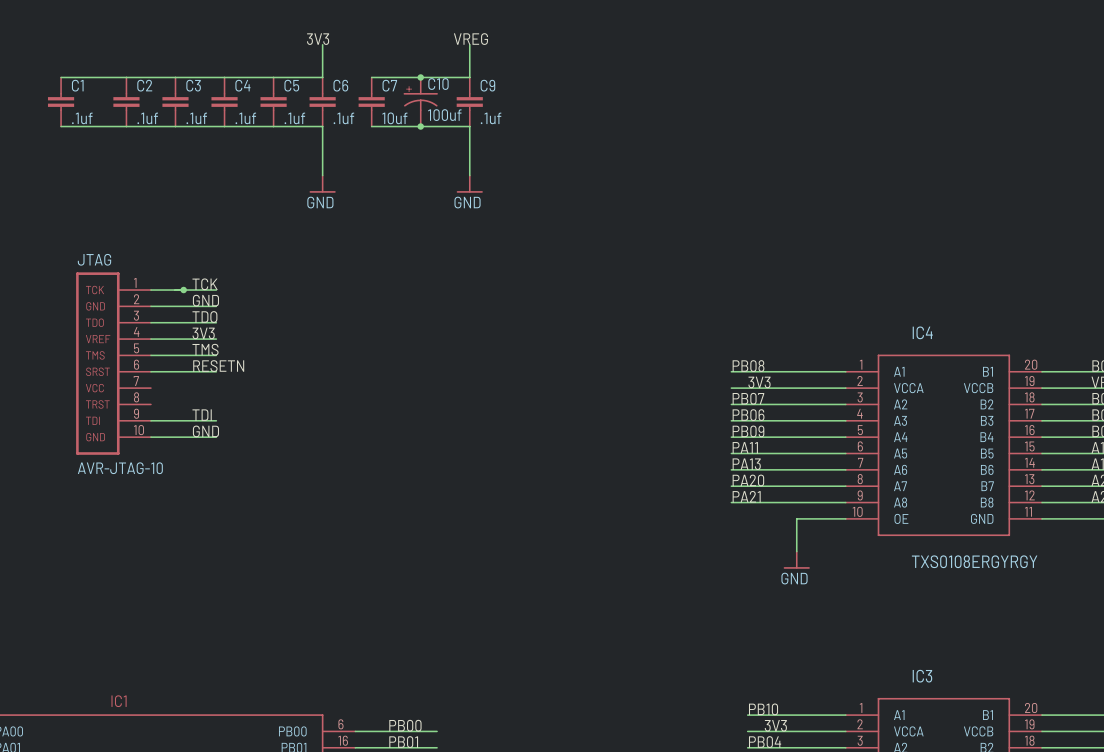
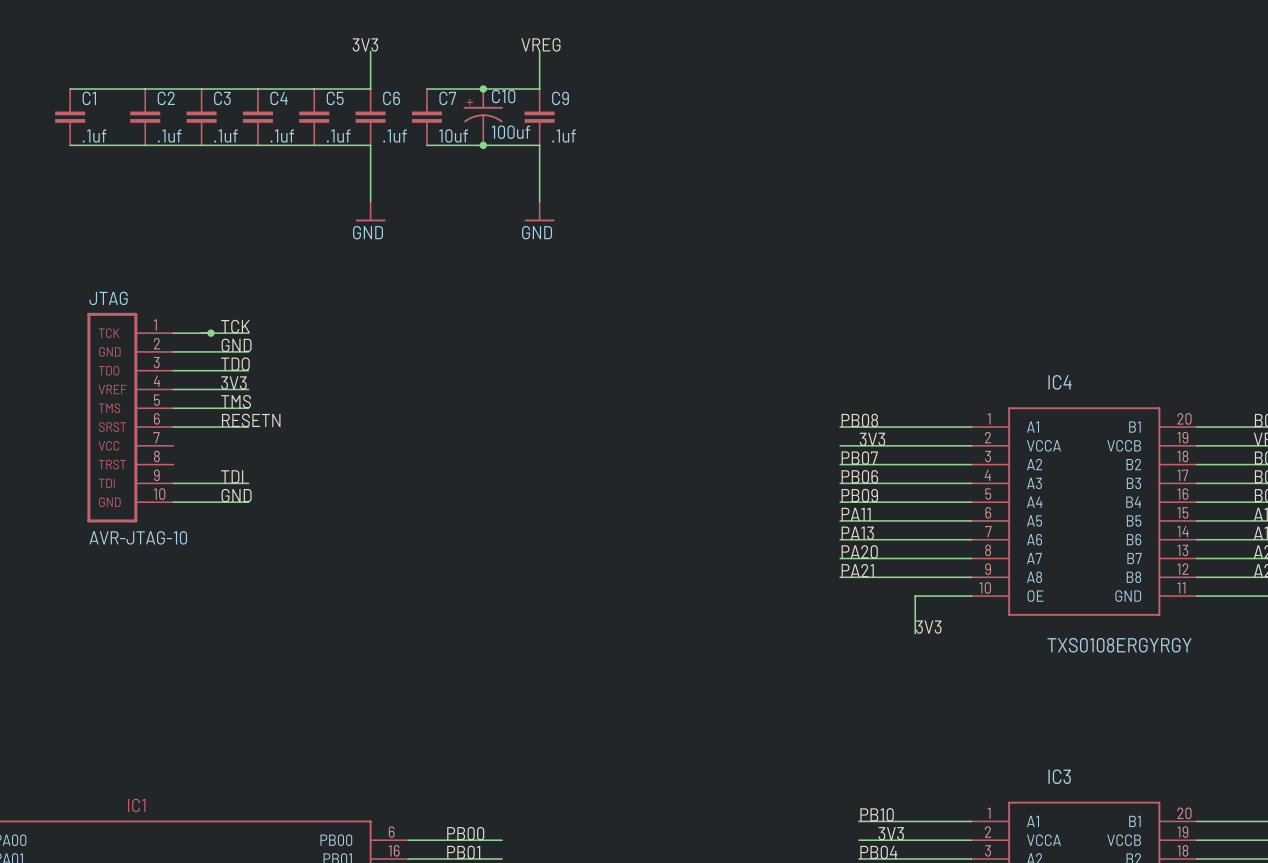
label: none -> 3V3 (928, 627)
power symbol: GND (796, 560) -> none

